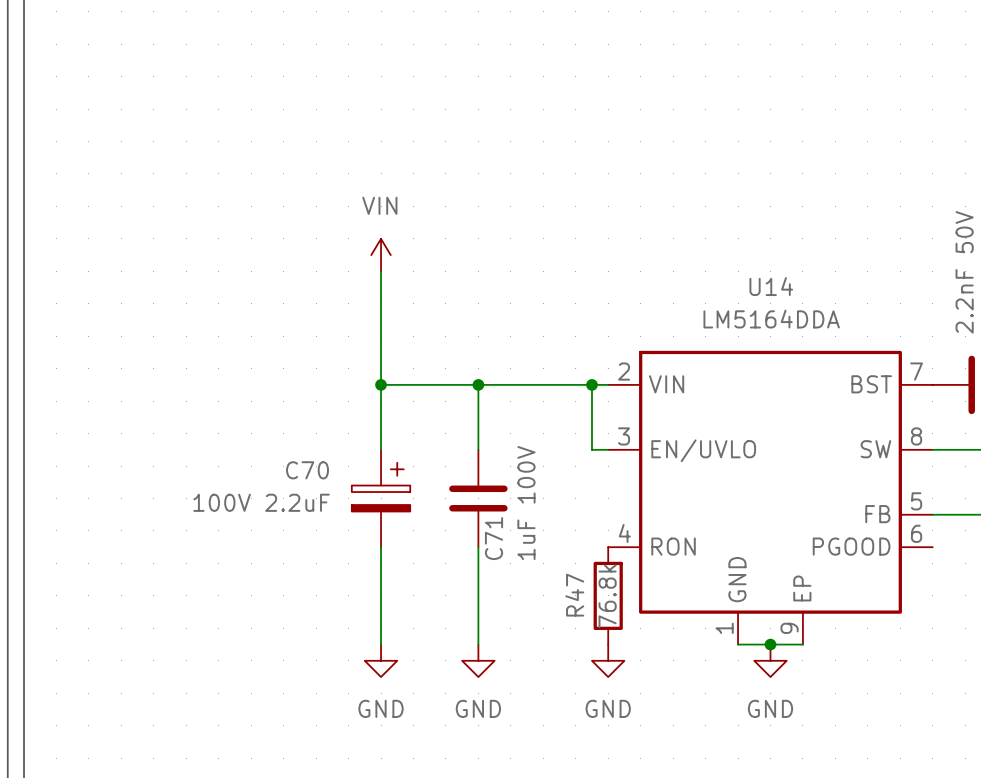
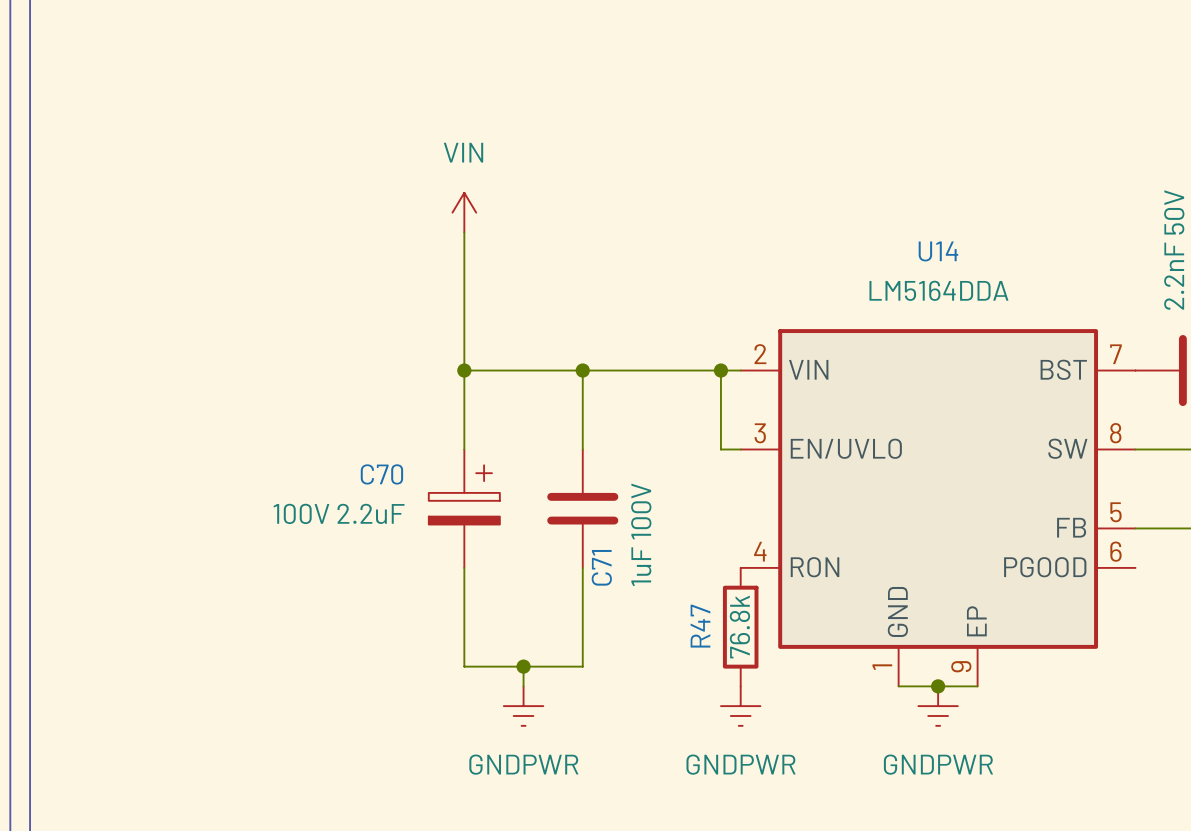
wire: (381, 628) (381, 644) -> (464, 666) (582, 666)
junction: none -> (523, 666)
wire: (478, 628) (478, 644) -> (523, 666) (523, 686)
power symbol: GND (381, 660) -> none
power symbol: none -> GNDPWR (523, 706)
power symbol: GND (478, 660) -> none
power symbol: GND (608, 660) -> GNDPWR (740, 706)
power symbol: GND (770, 660) -> GNDPWR (938, 706)

